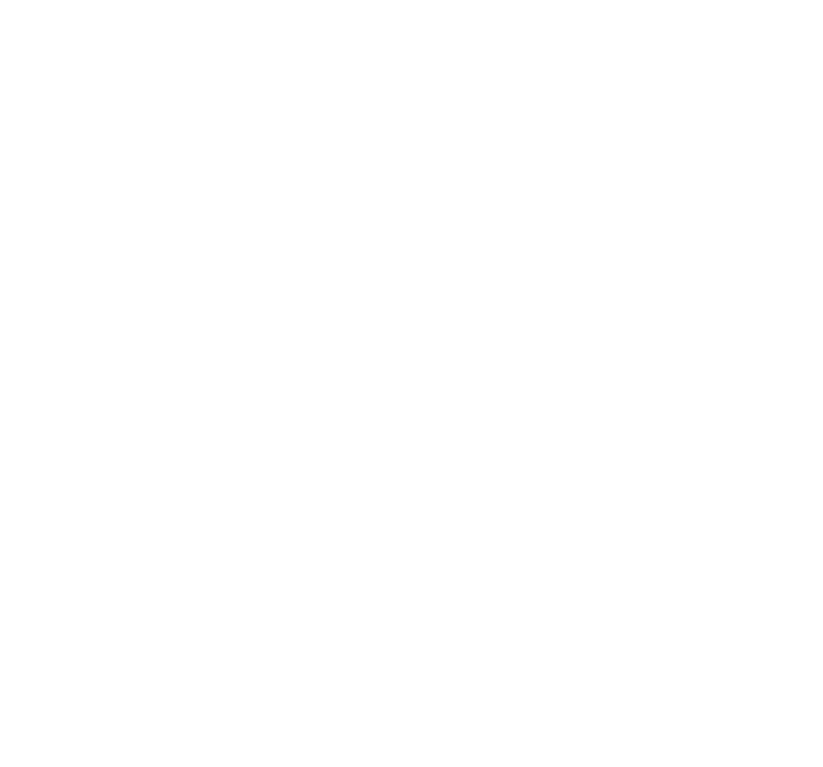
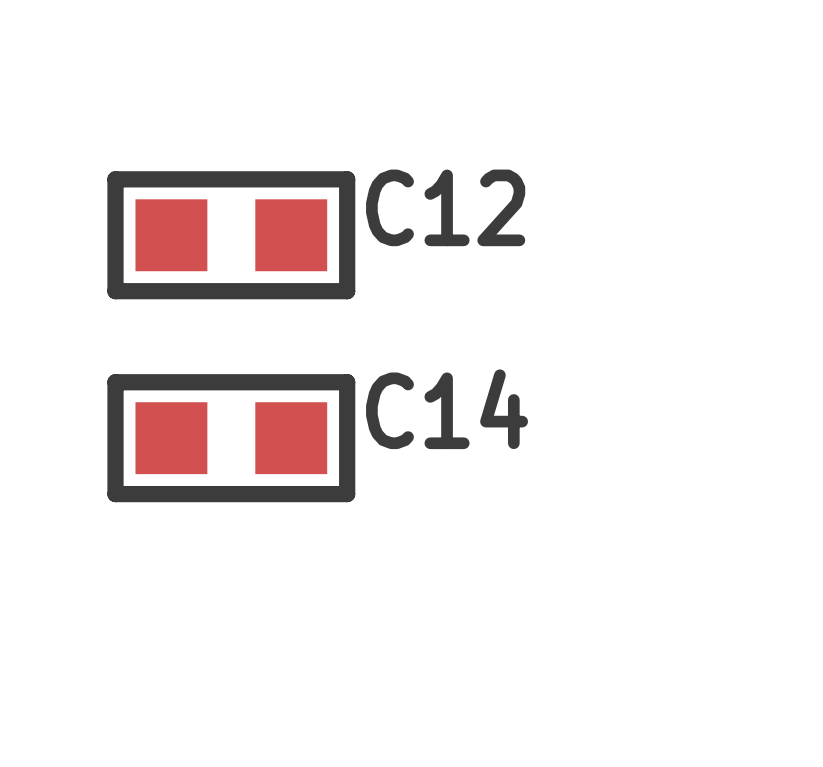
C12: none -> (231, 235)
C14: none -> (231, 438)

